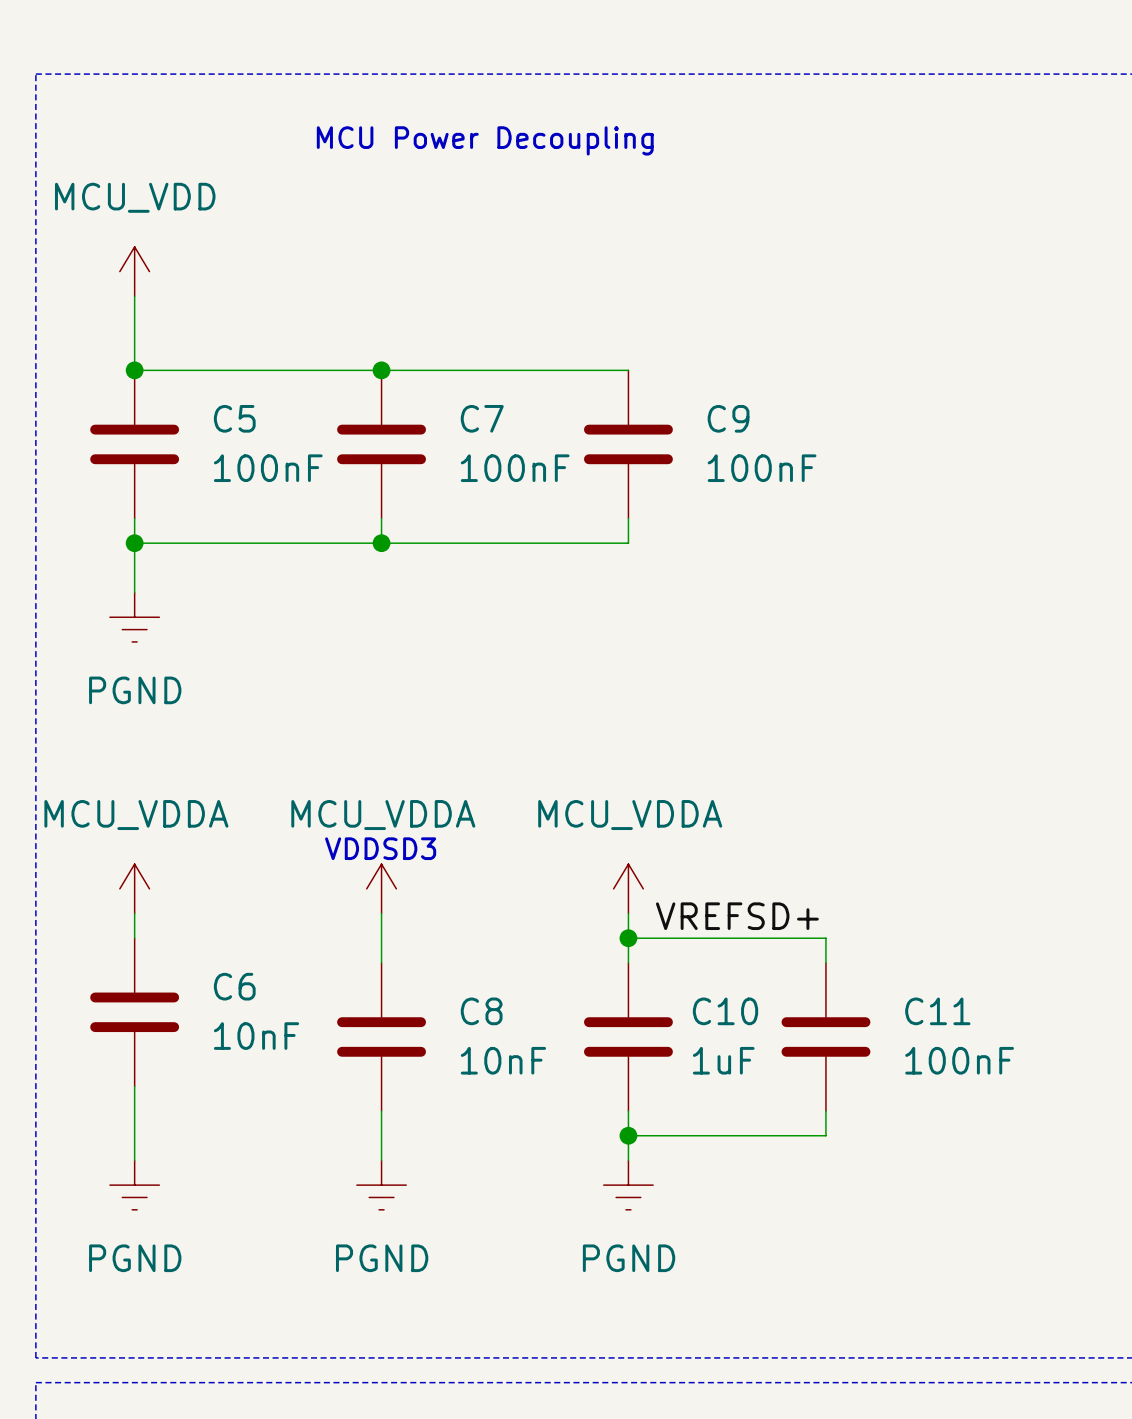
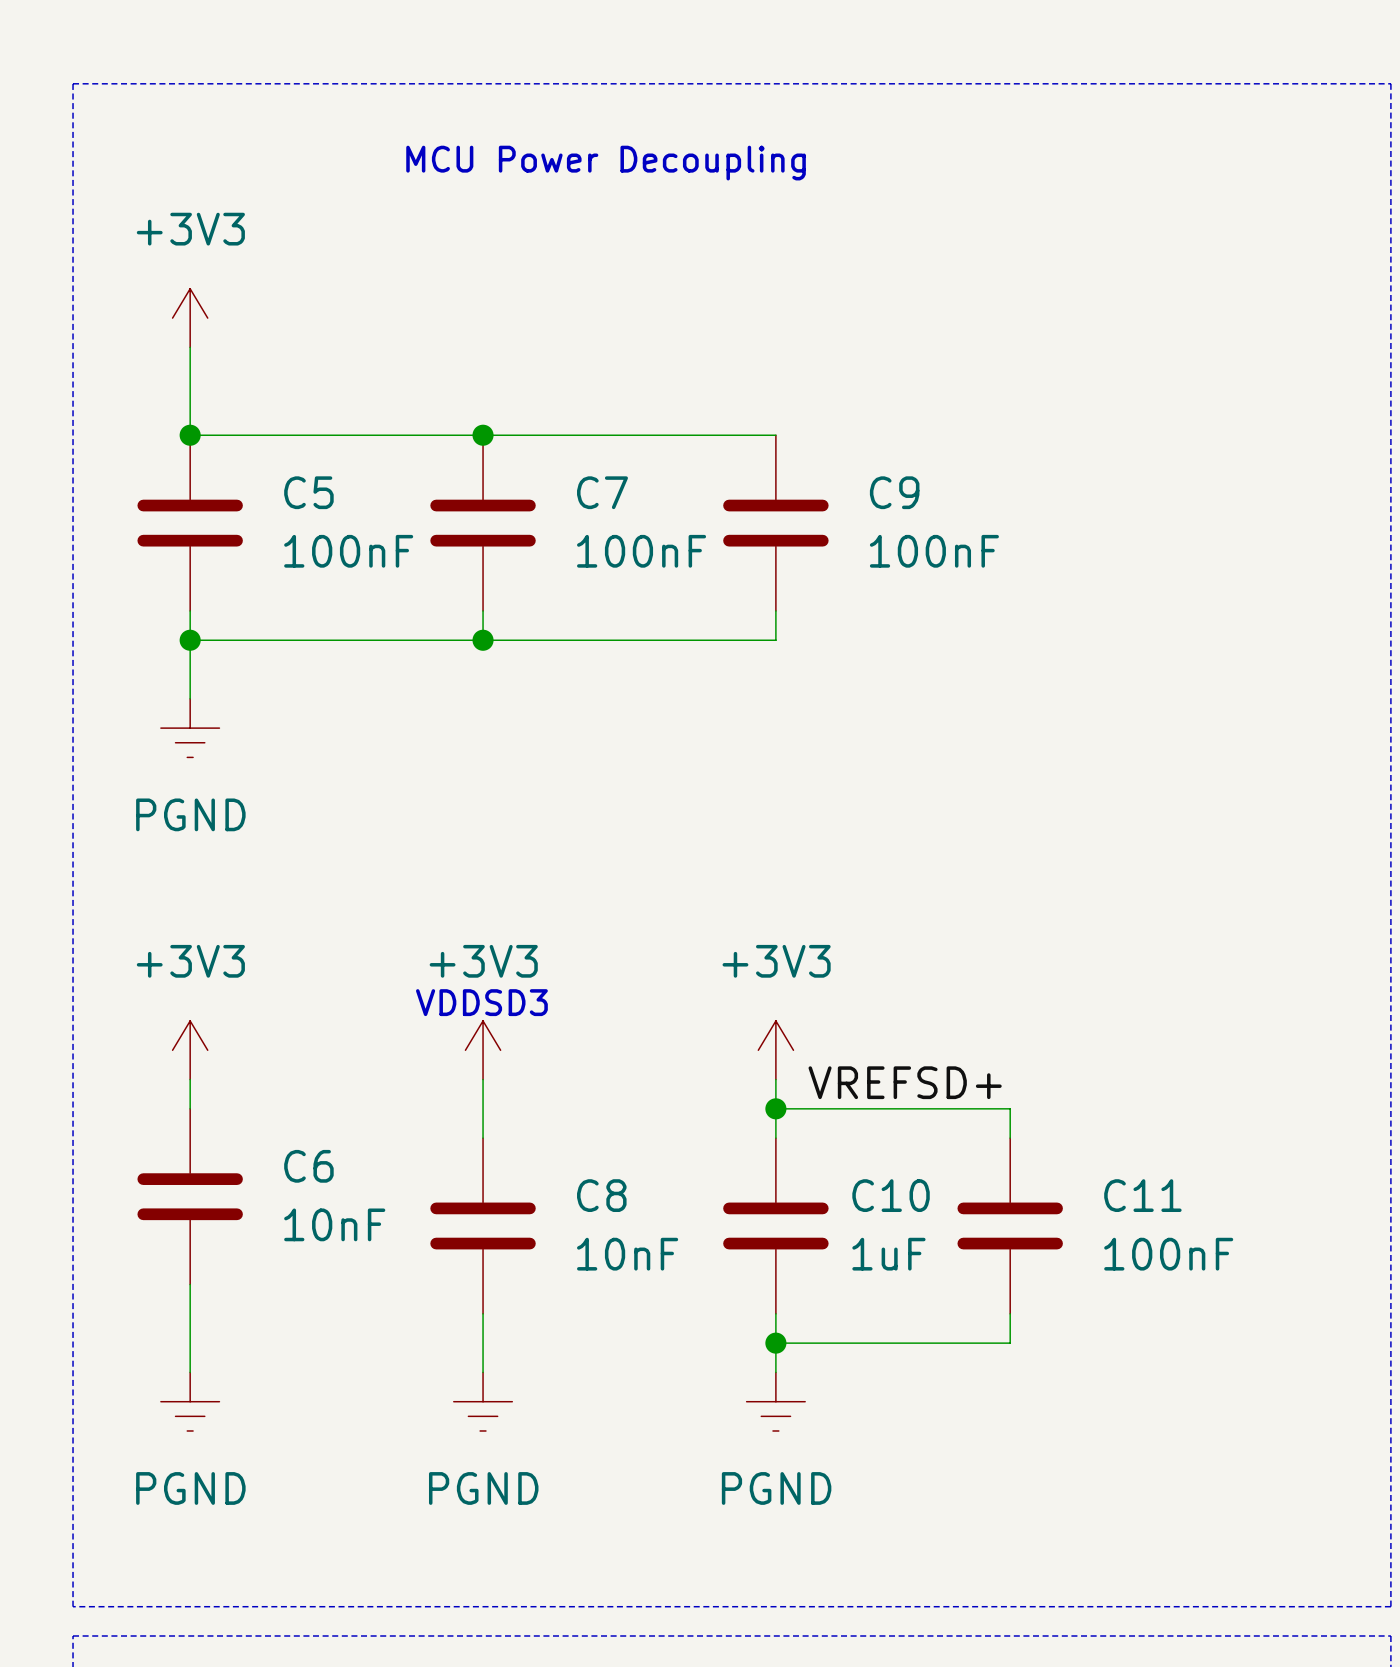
power symbol: MCU_VDD (134, 271) -> +3V3 (190, 318)
power symbol: MCU_VDDA (134, 888) -> +3V3 (190, 1050)
power symbol: MCU_VDDA (381, 888) -> +3V3 (483, 1050)
power symbol: MCU_VDDA (628, 888) -> +3V3 (775, 1050)

